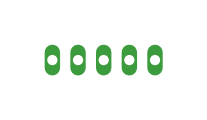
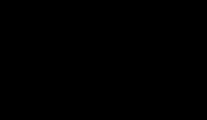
part: (103, 60) -> none

